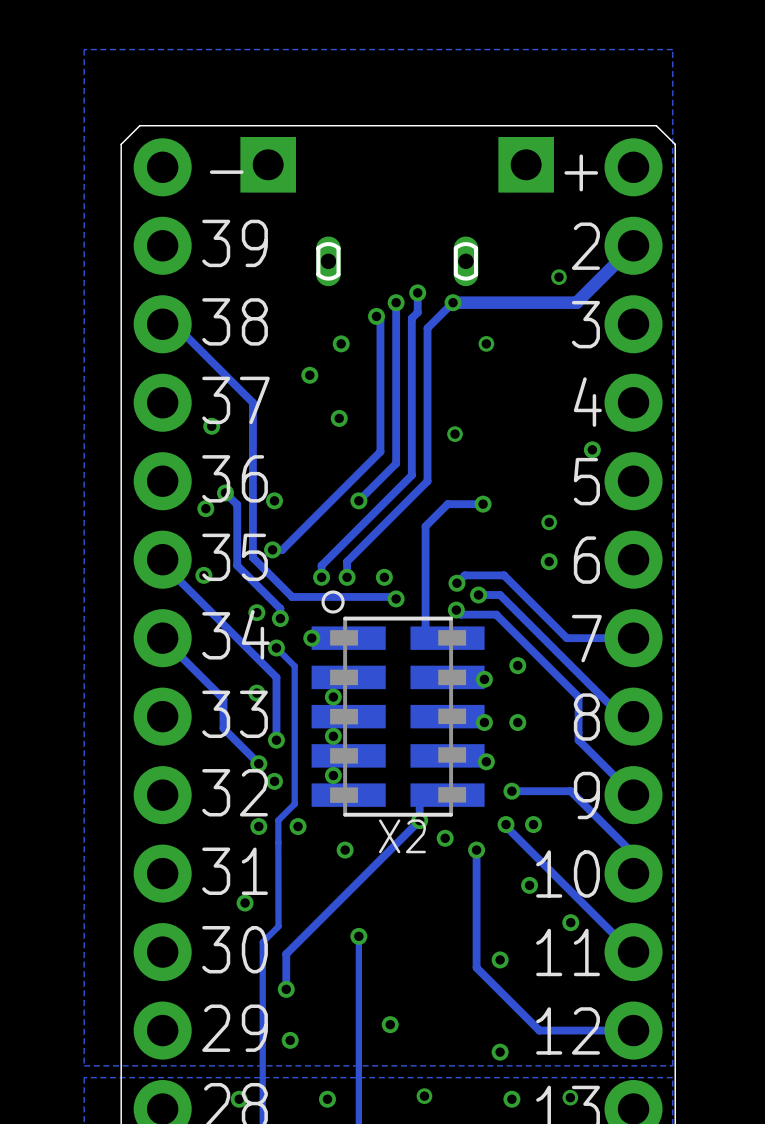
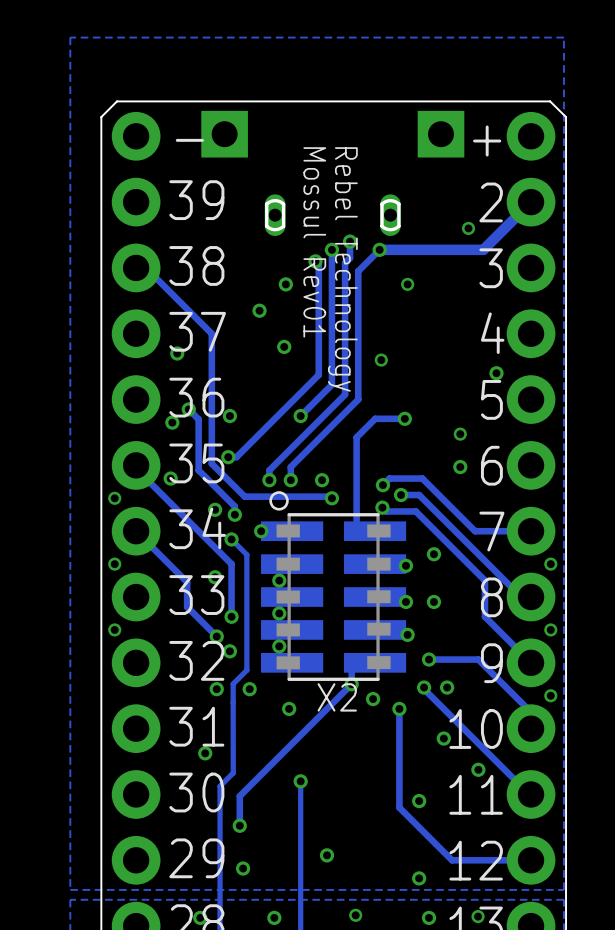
text: none -> Mossul Rev01 (314, 242)
text: none -> Rebel Technology (342, 269)
via: none -> (114, 498)
via: none -> (114, 564)
via: none -> (550, 564)
via: none -> (114, 629)
via: none -> (550, 629)
via: none -> (550, 695)

